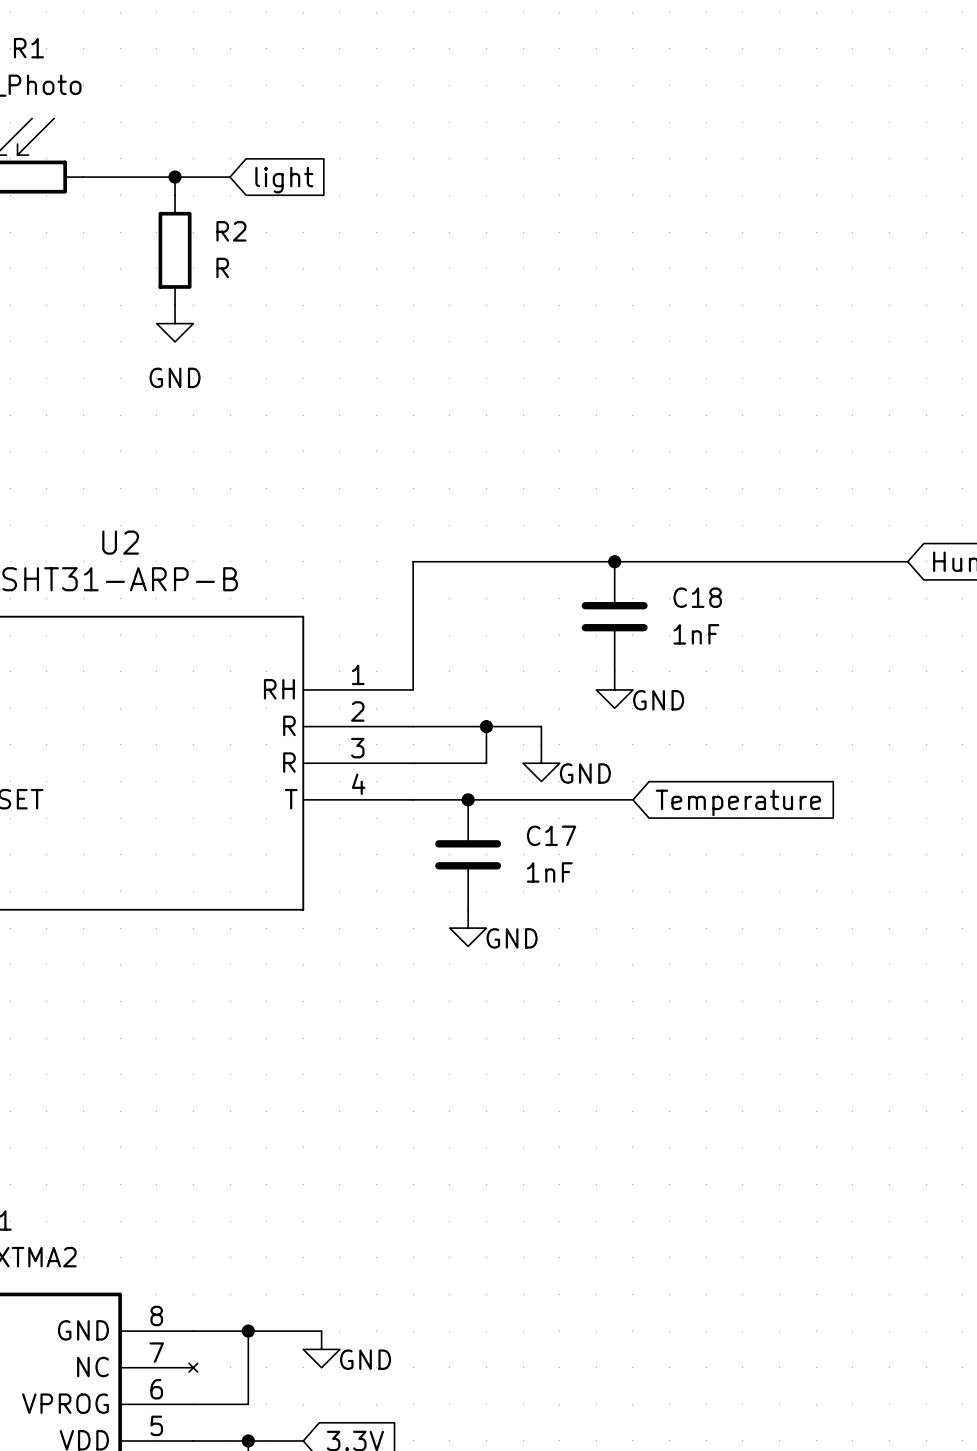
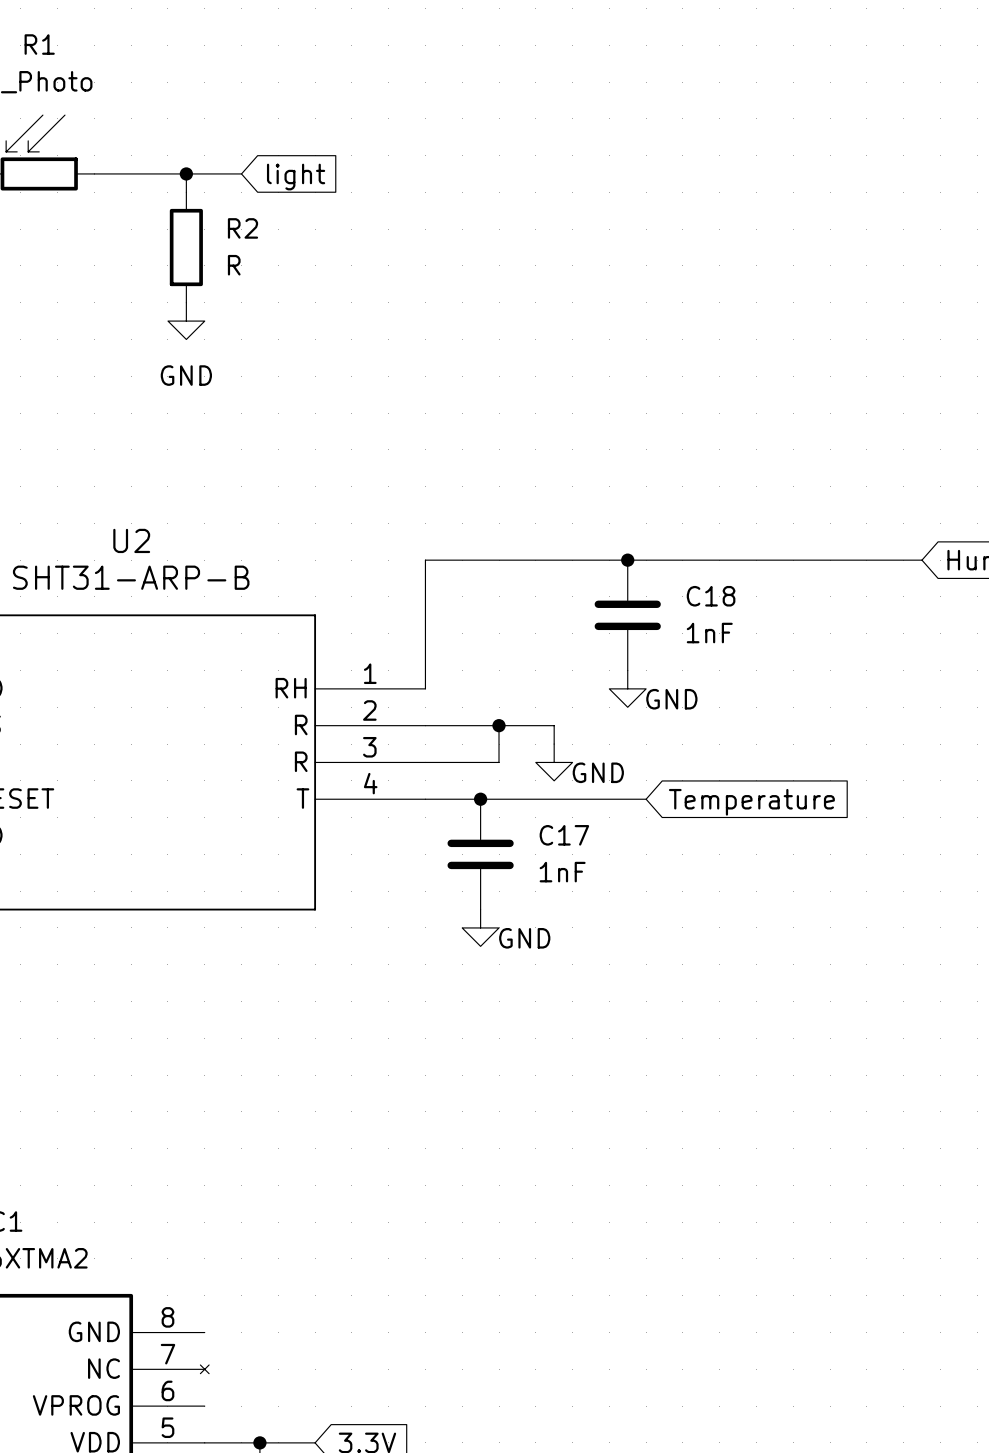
wire: (193, 1331) (321, 1331) -> none
wire: (248, 1331) (248, 1404) (193, 1404) -> none
junction: (248, 1331) -> none
power symbol: GND (321, 1349) -> none

